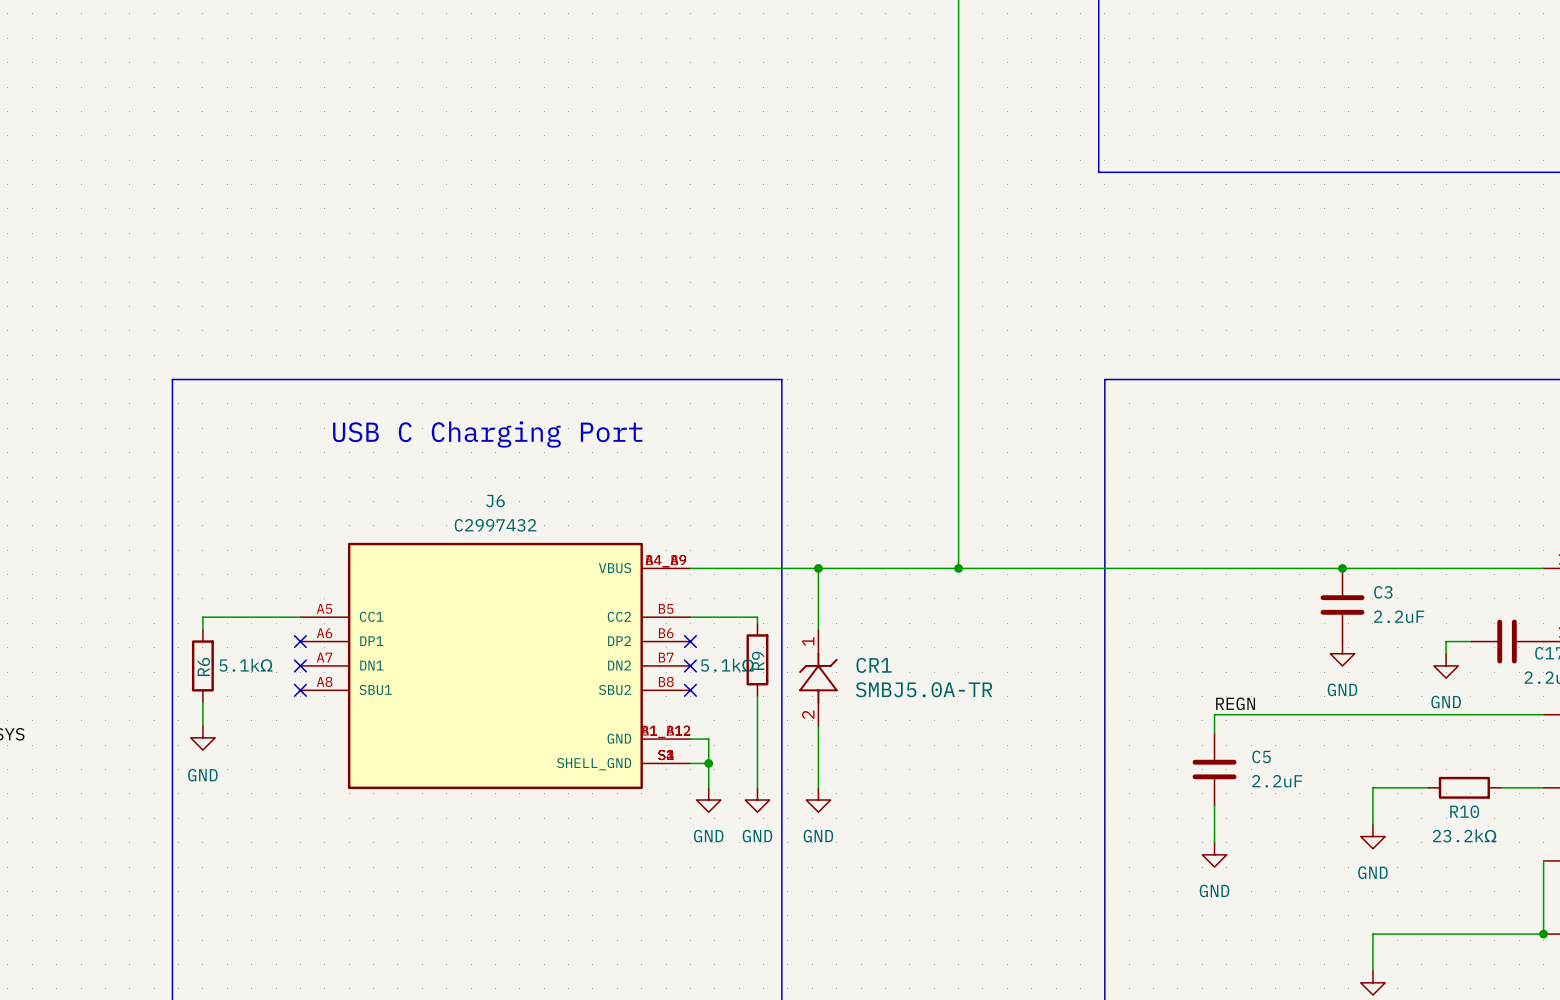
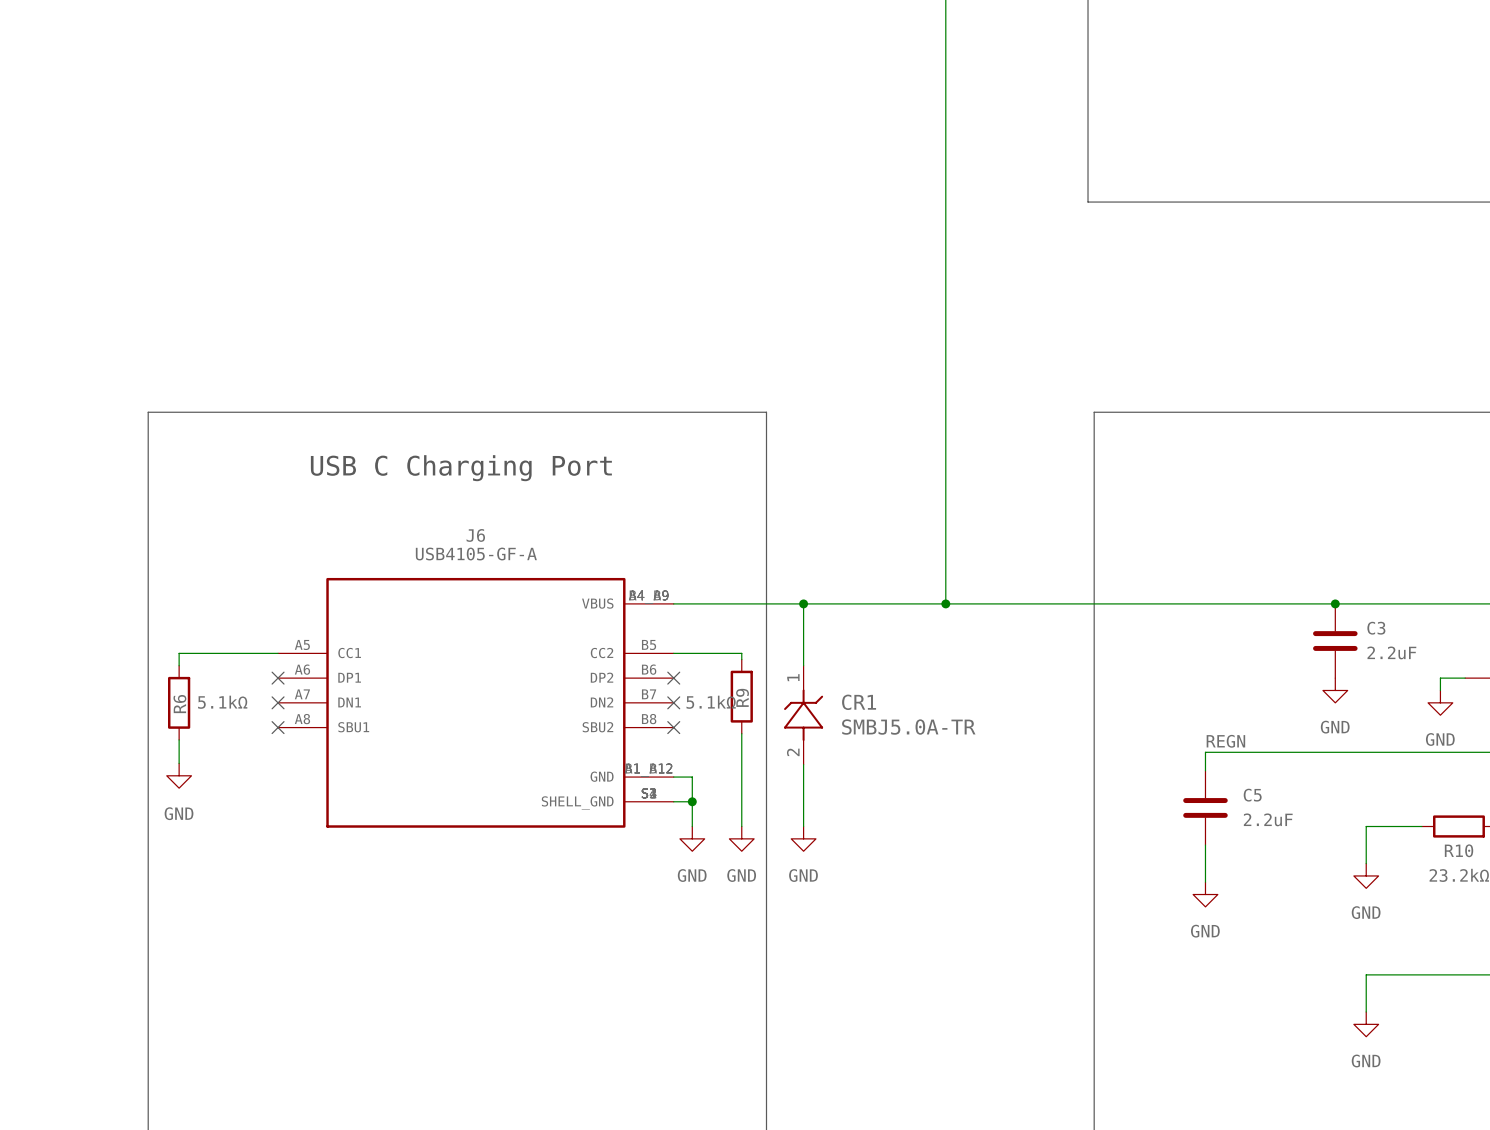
J6 value: C2997432 (495, 525) -> USB4105-GF-A (476, 554)

